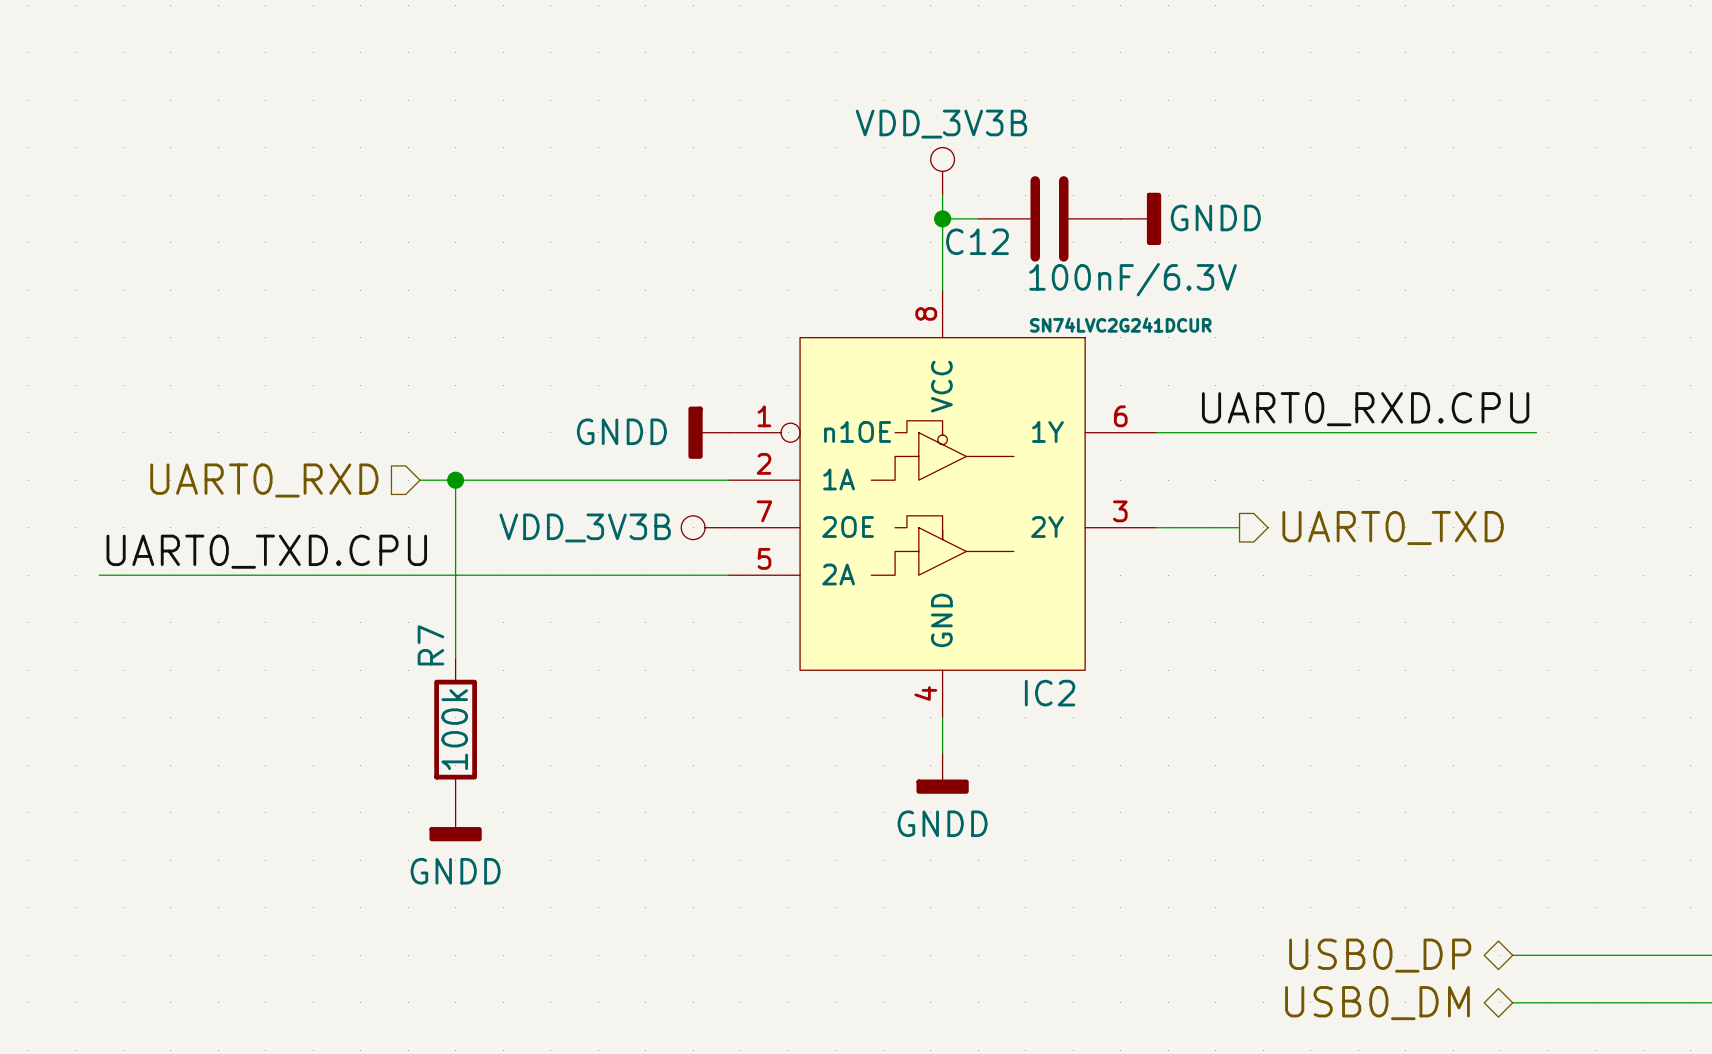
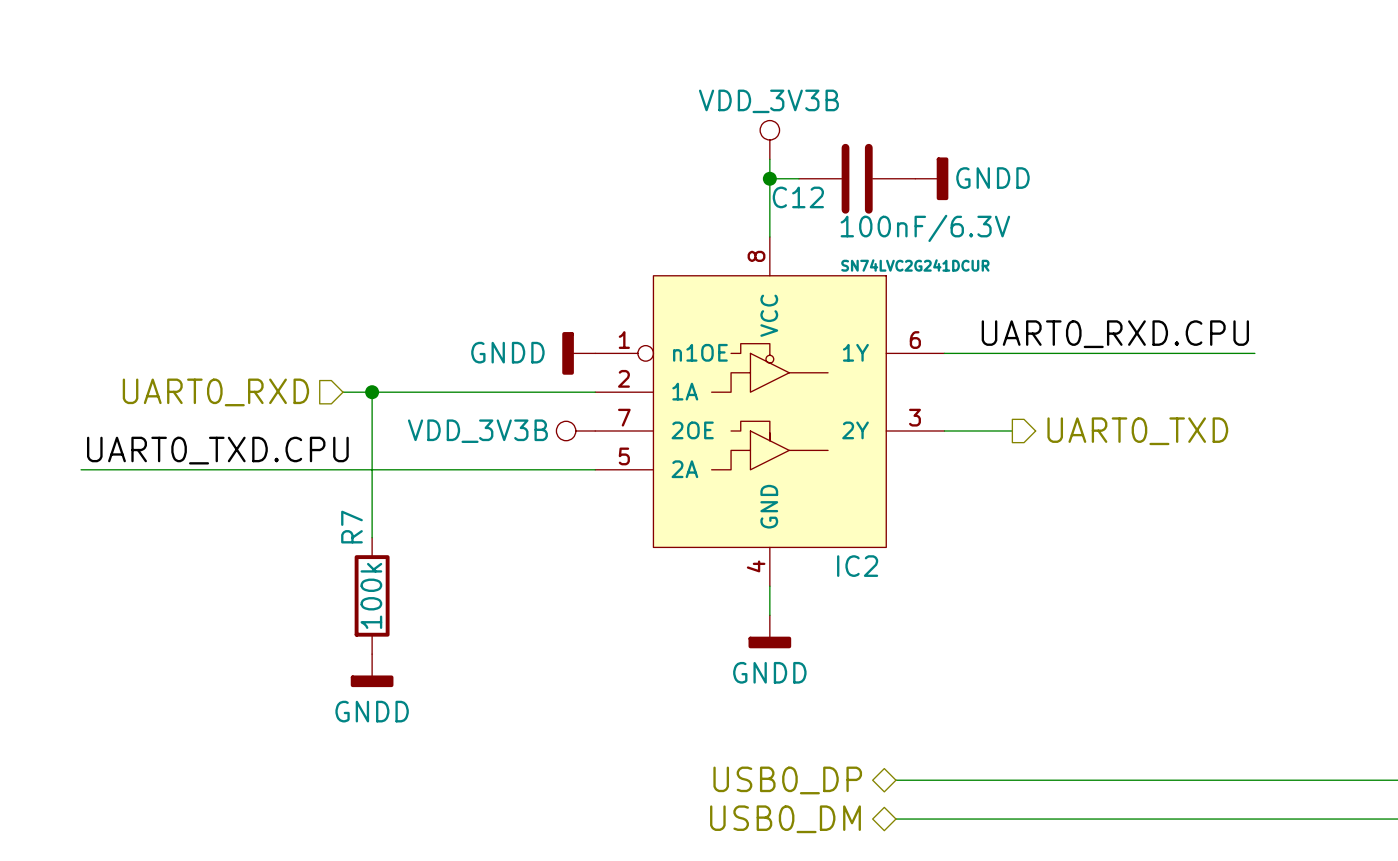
wire: none -> (895, 780) (1235, 780)
hierarchical label position: USB0_DP (1380, 955) -> USB0_DP (787, 780)
wire: none -> (895, 819) (1235, 819)
hierarchical label position: USB0_DM (1377, 1003) -> USB0_DM (785, 819)

